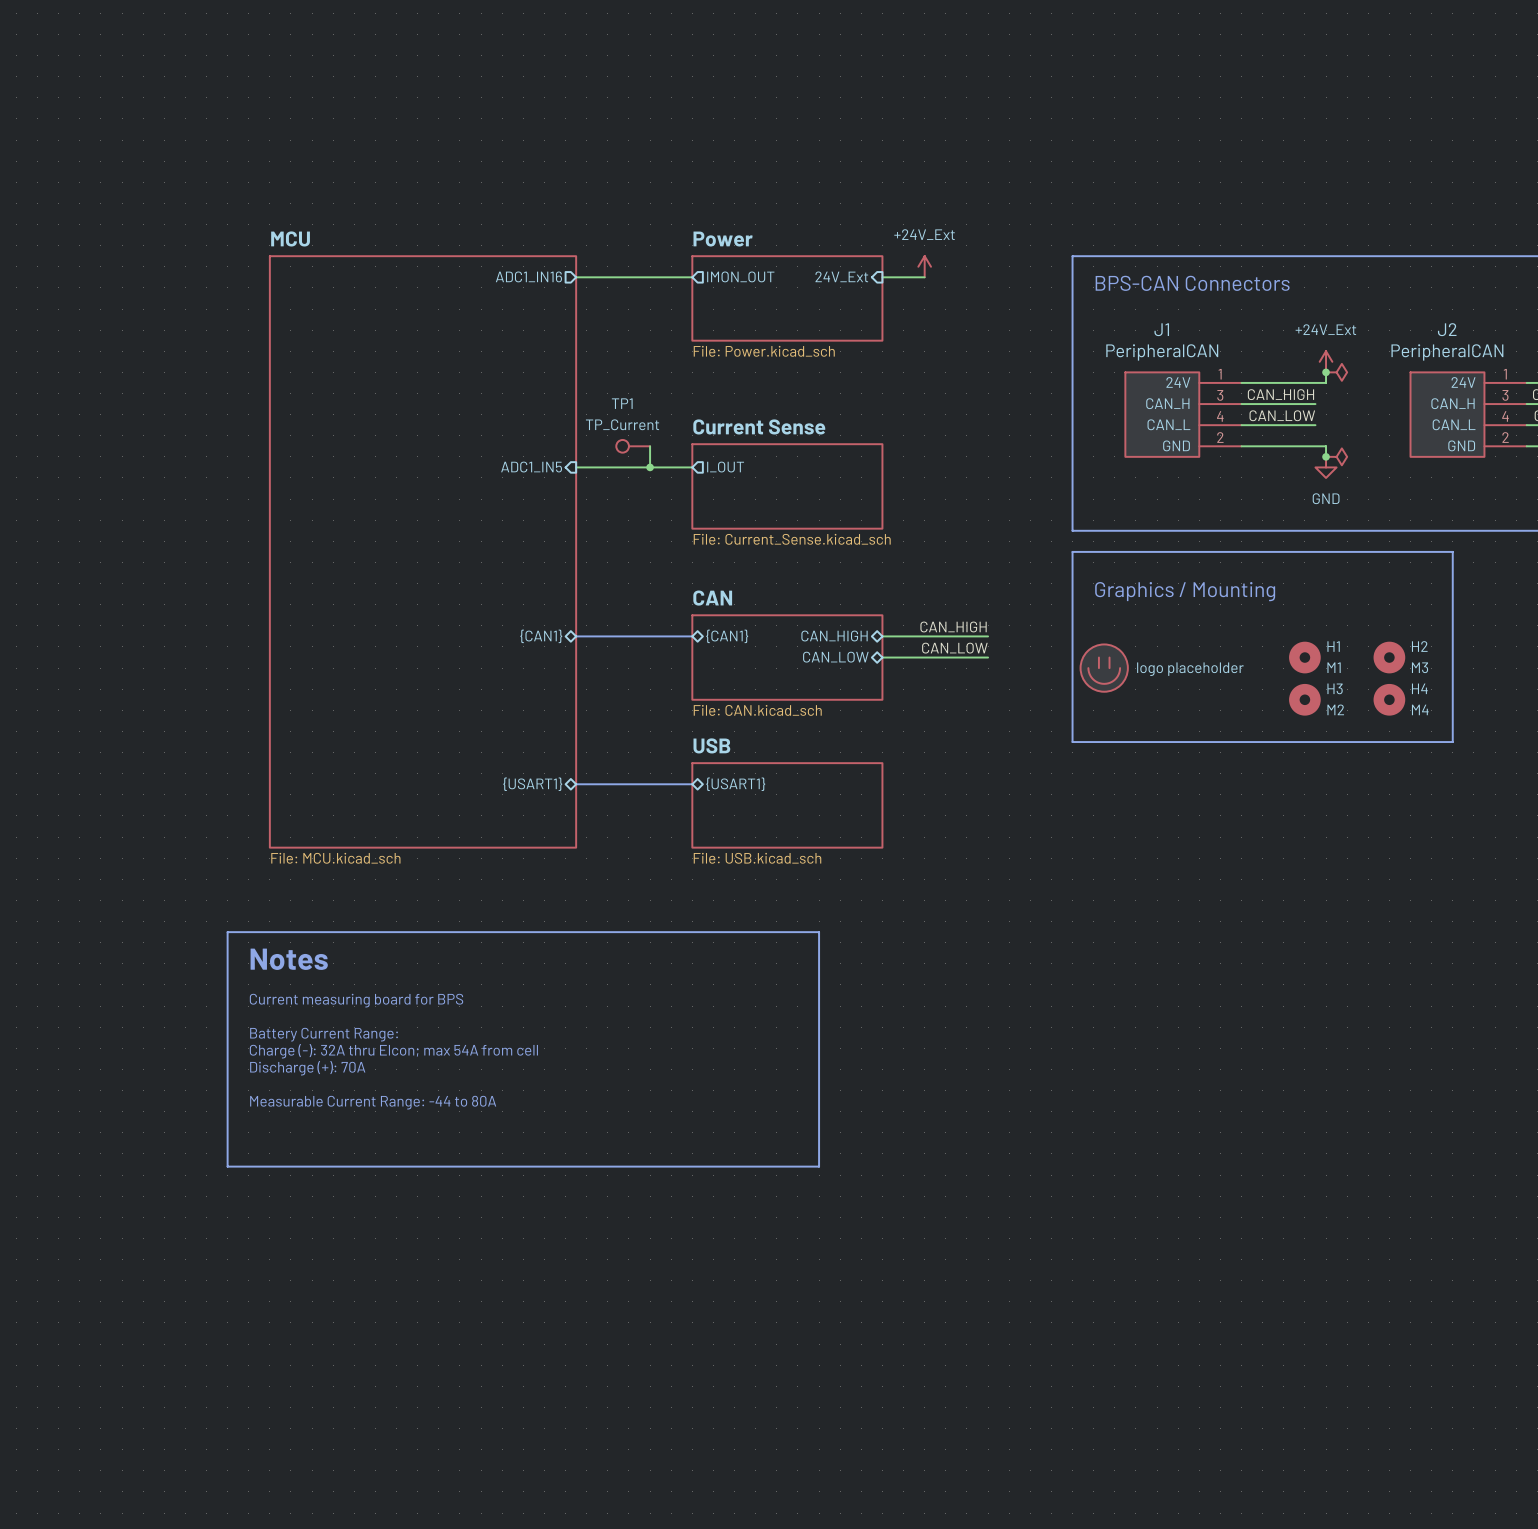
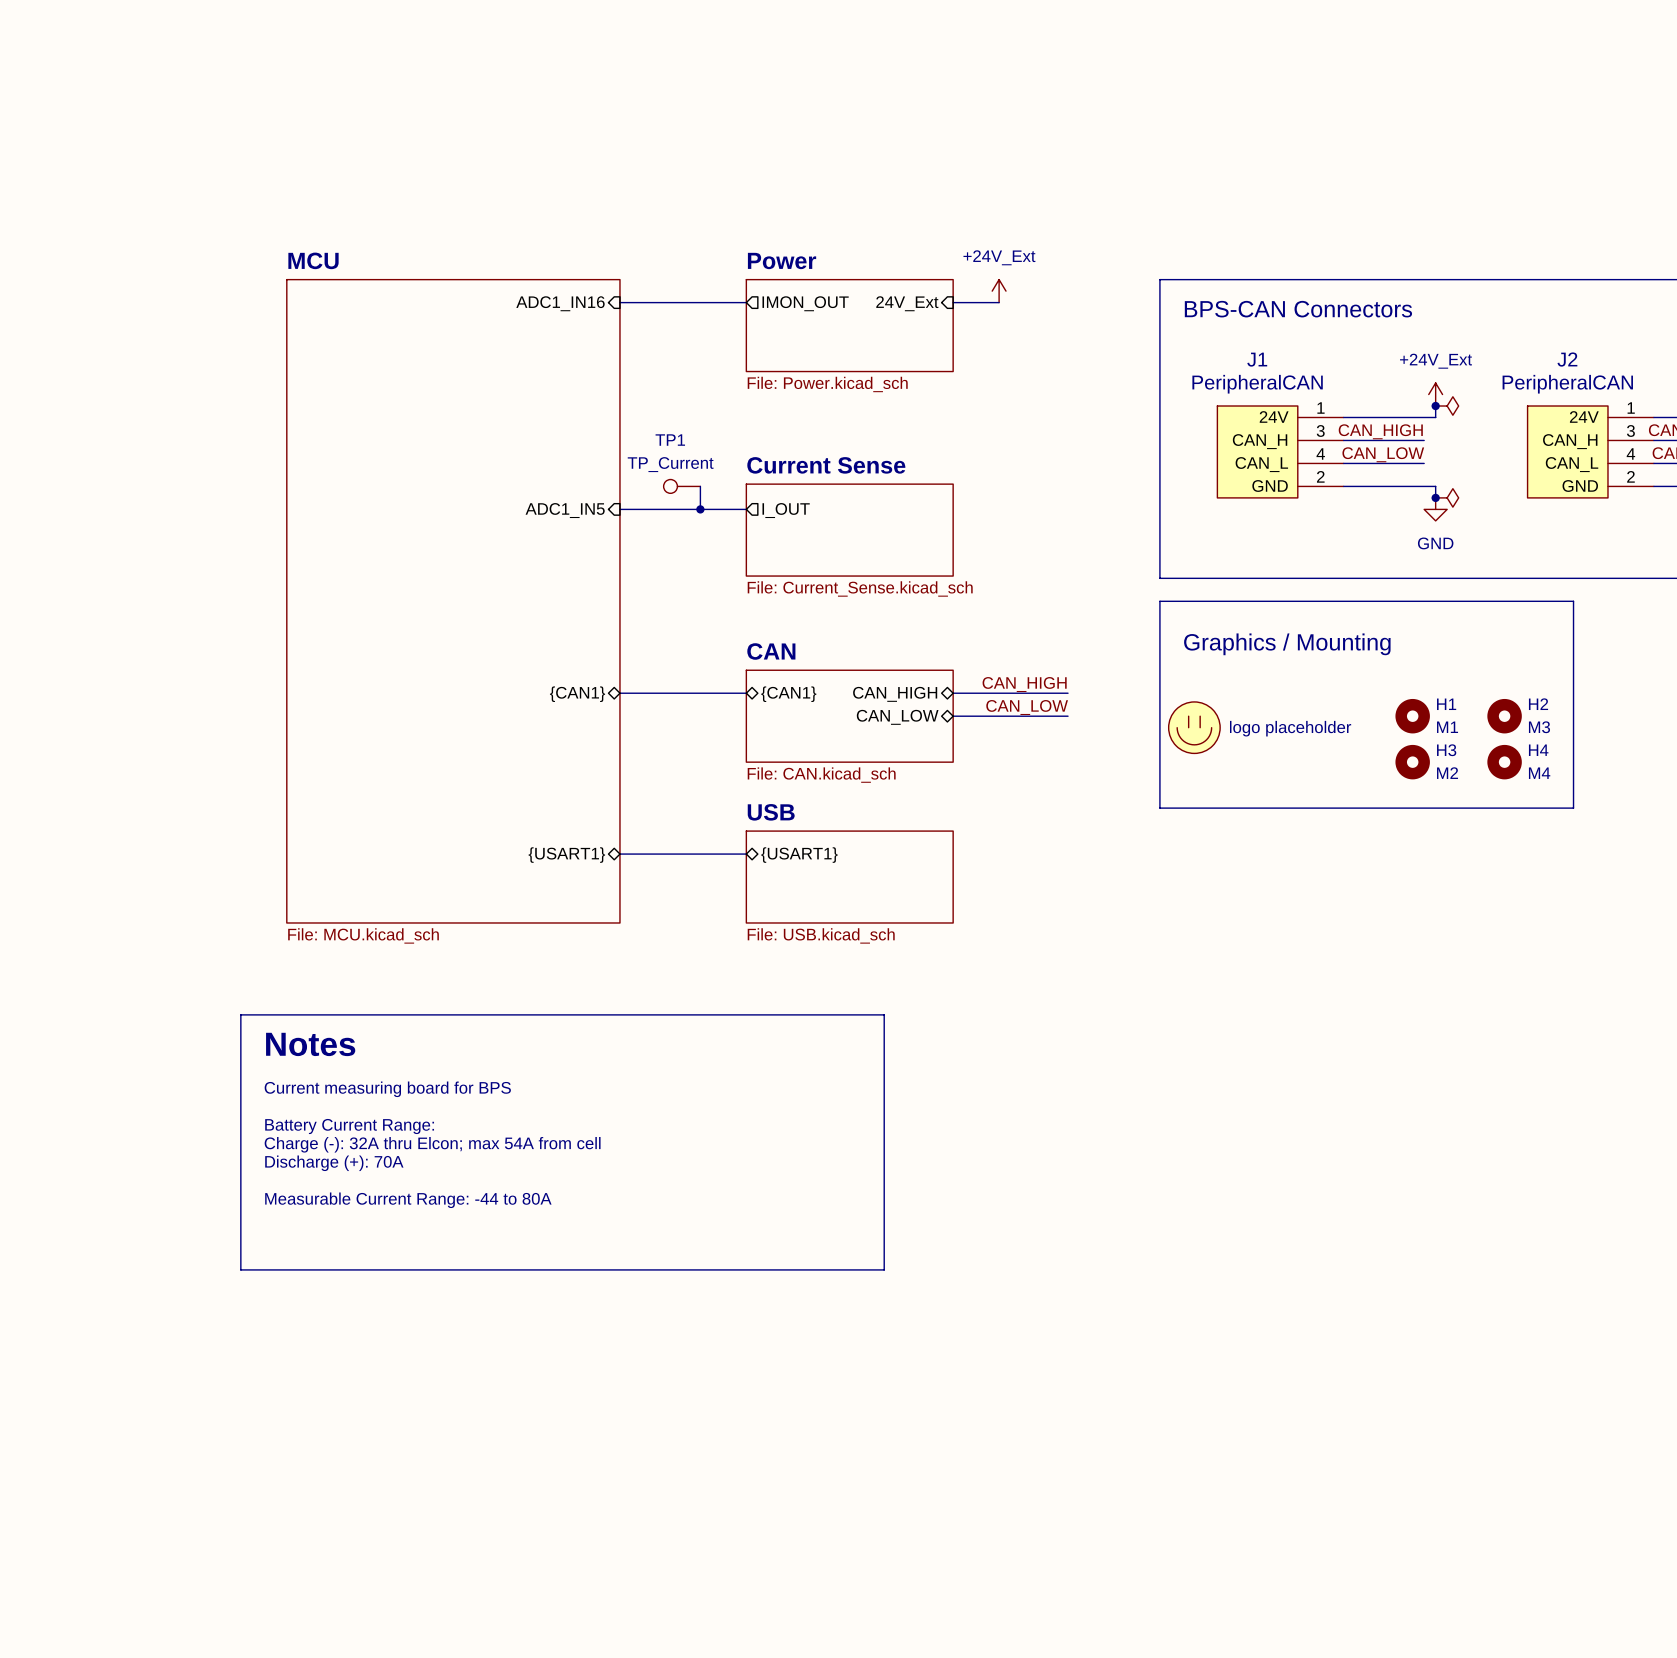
sheet pin shape: output (528, 276) -> input (560, 303)

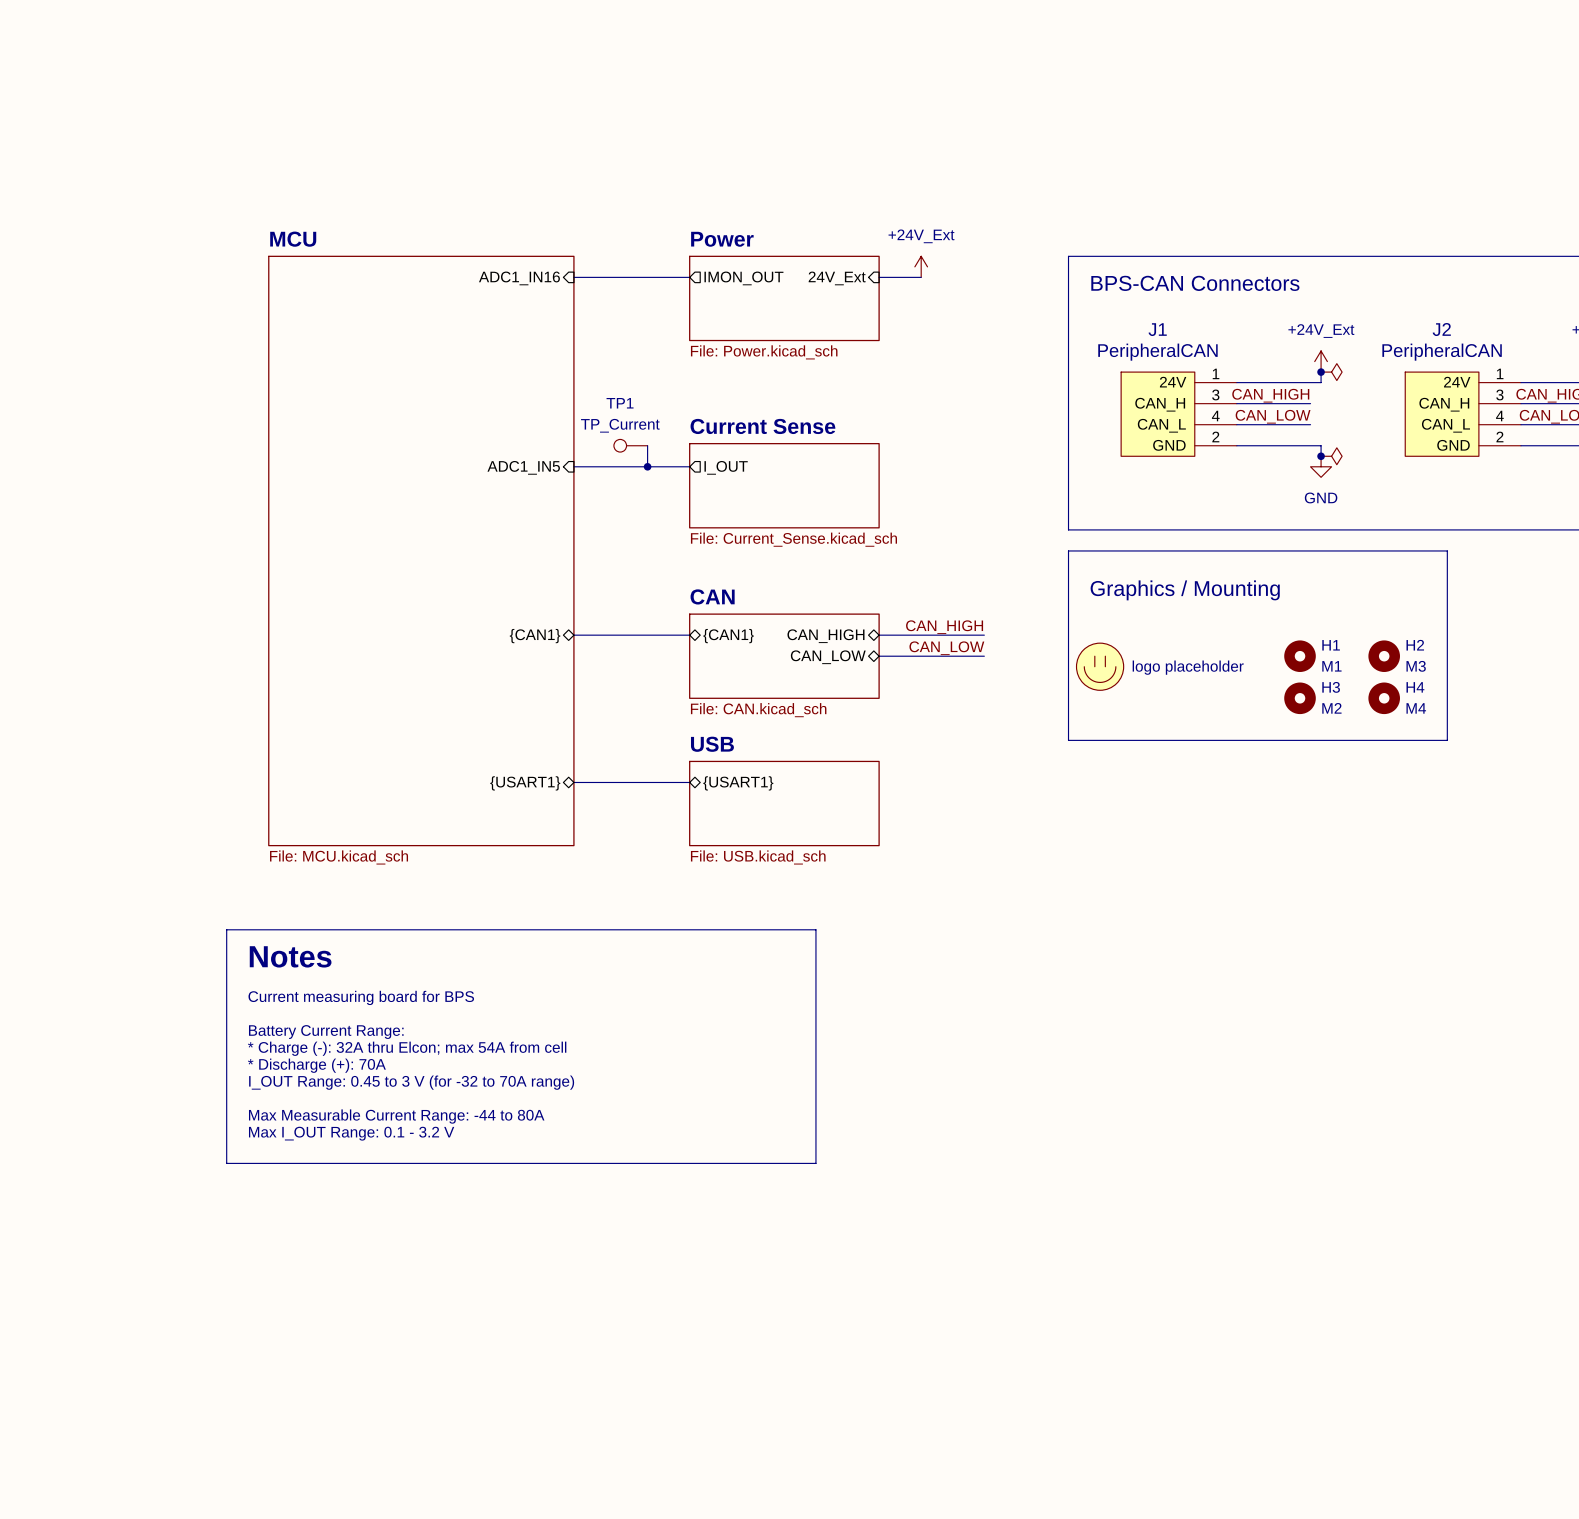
text: Charge (-): 32A thru Elcon; max 54A from cell (432, 1144) -> * Charge (-): 32A thru Elcon; max 54A from cell (407, 1048)
text: Discharge (+): 70A (334, 1163) -> * Discharge (+): 70A (316, 1065)
text: none -> I_OUT Range: 0.45 to 3 V (for -32 to 70A range) (411, 1082)
text: Measurable Current Range: -44 to 80A (408, 1200) -> Max Measurable Current Range: -44 to 80A (396, 1116)
text: none -> Max I_OUT Range: 0.1 - 3.2 V (351, 1133)

